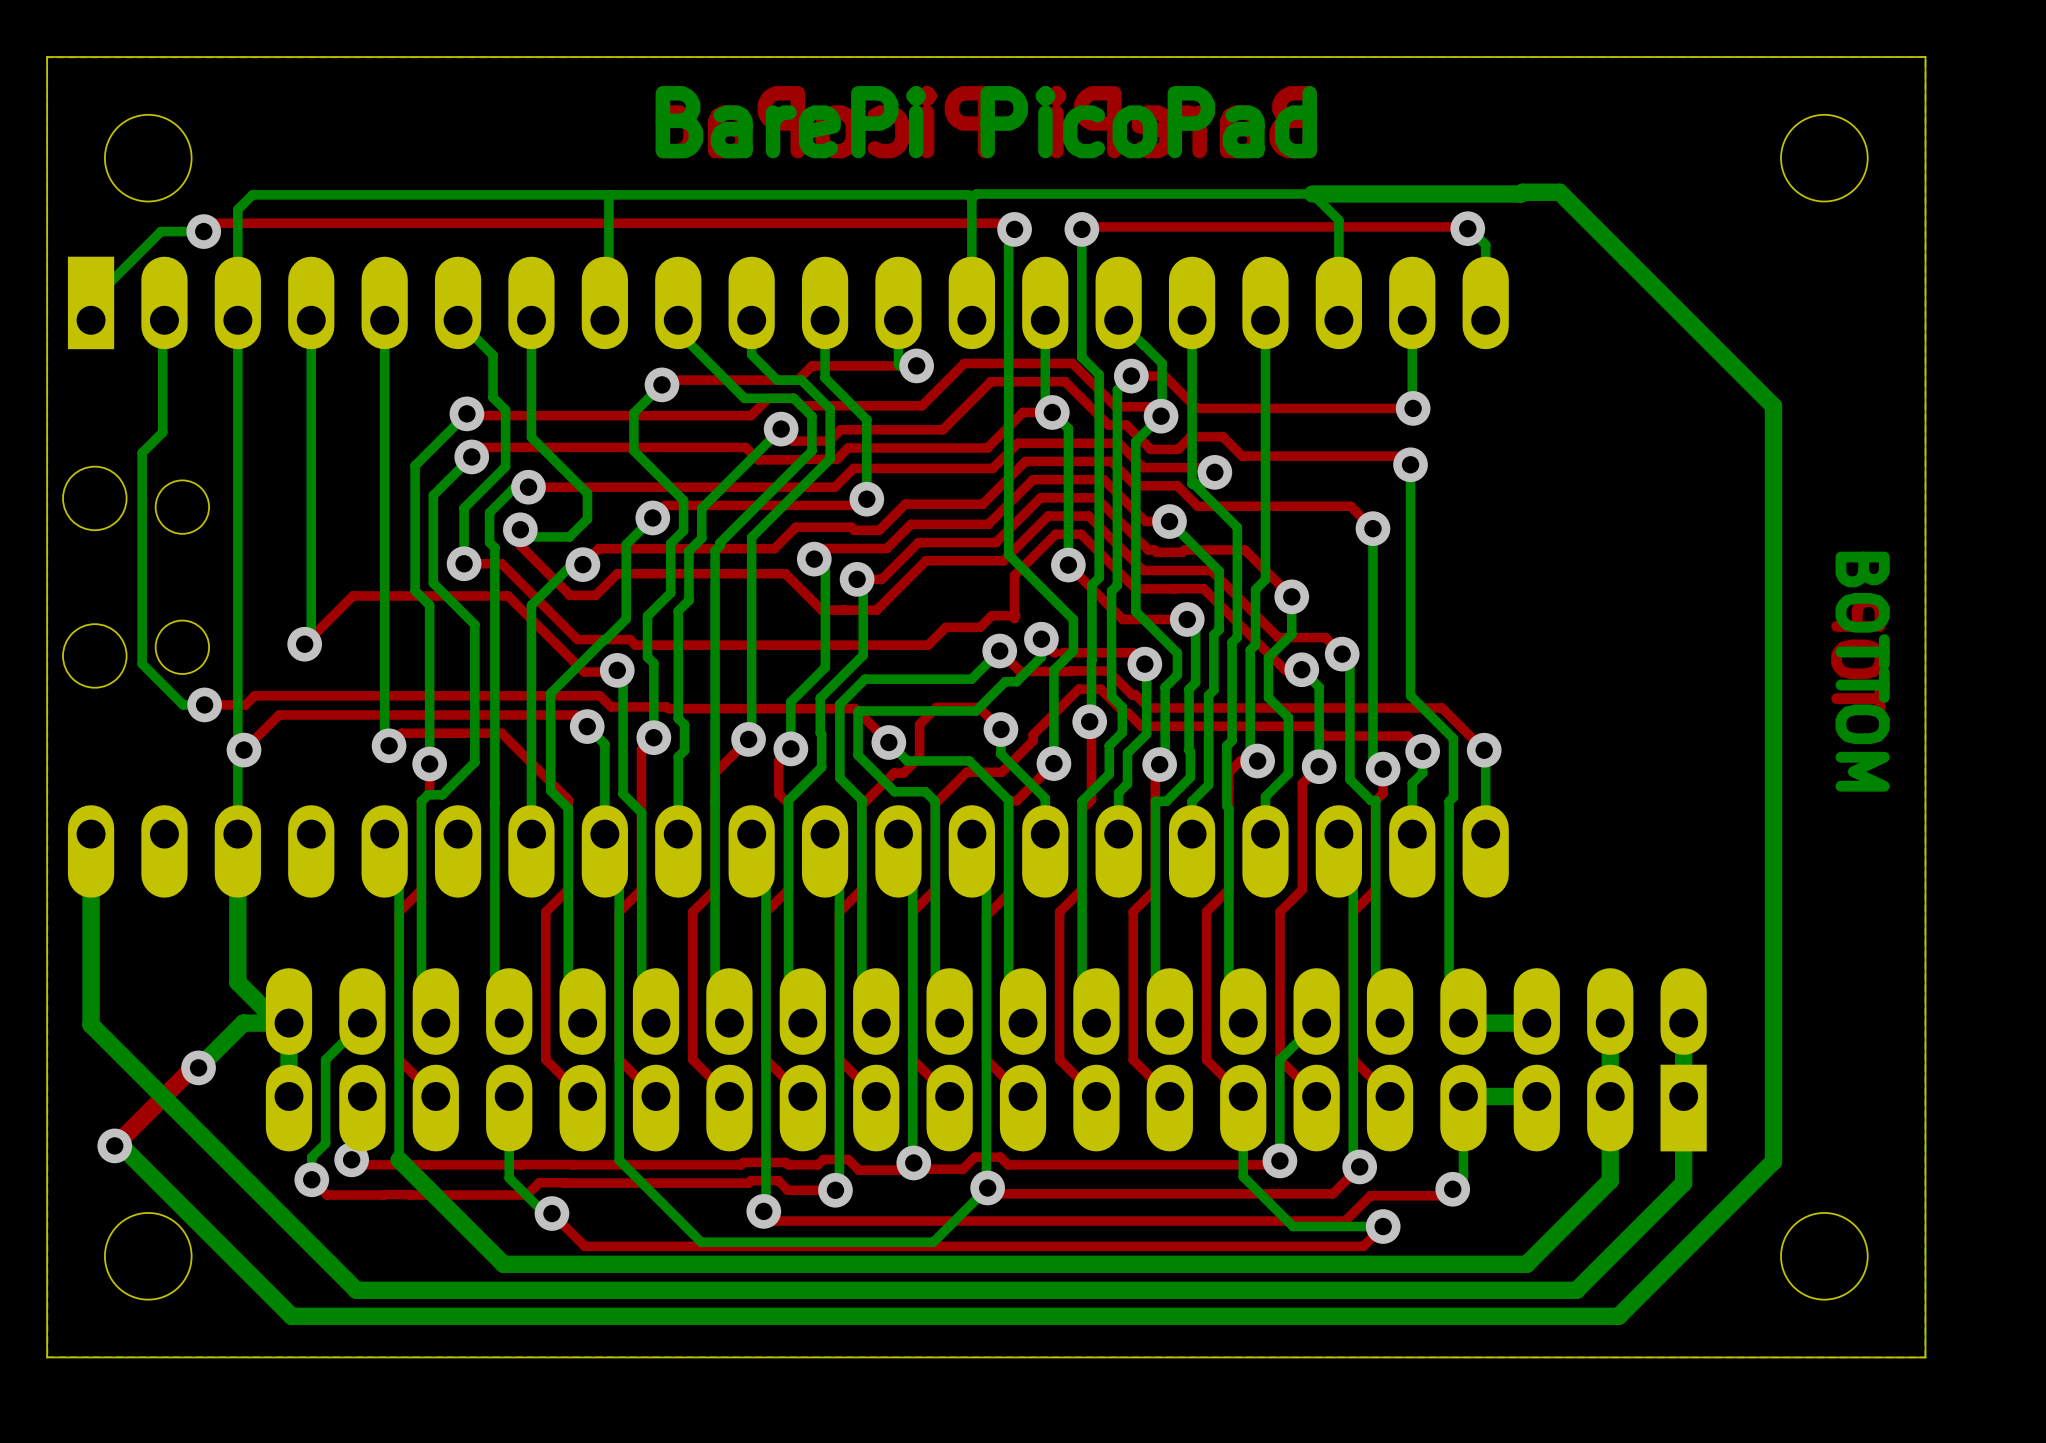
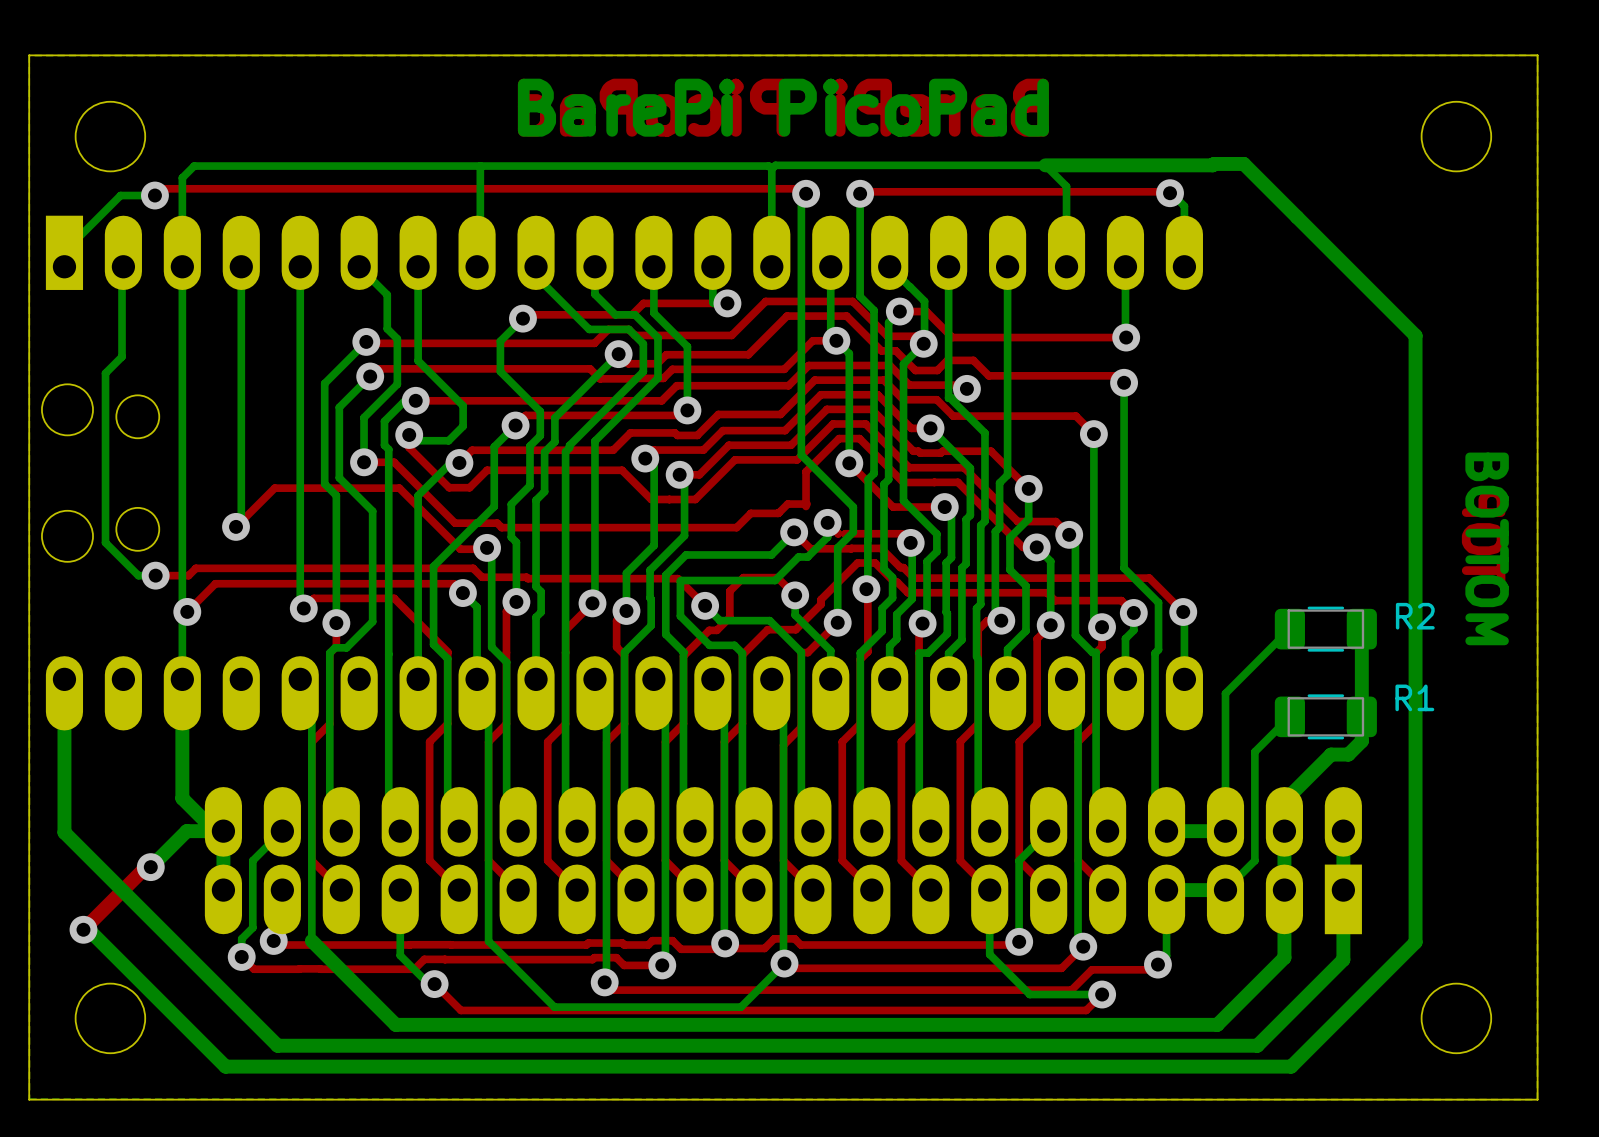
bottom track: none -> (1289, 629) (1225, 693) (1225, 831)
R2: none -> (1325, 629)
bottom track: none -> (1361, 629) (1361, 741) (1348, 754) (1331, 754) (1284, 801) (1284, 831)
bottom track: none -> (1289, 716) (1254, 751) (1254, 860) (1225, 890)
R1: none -> (1325, 716)

